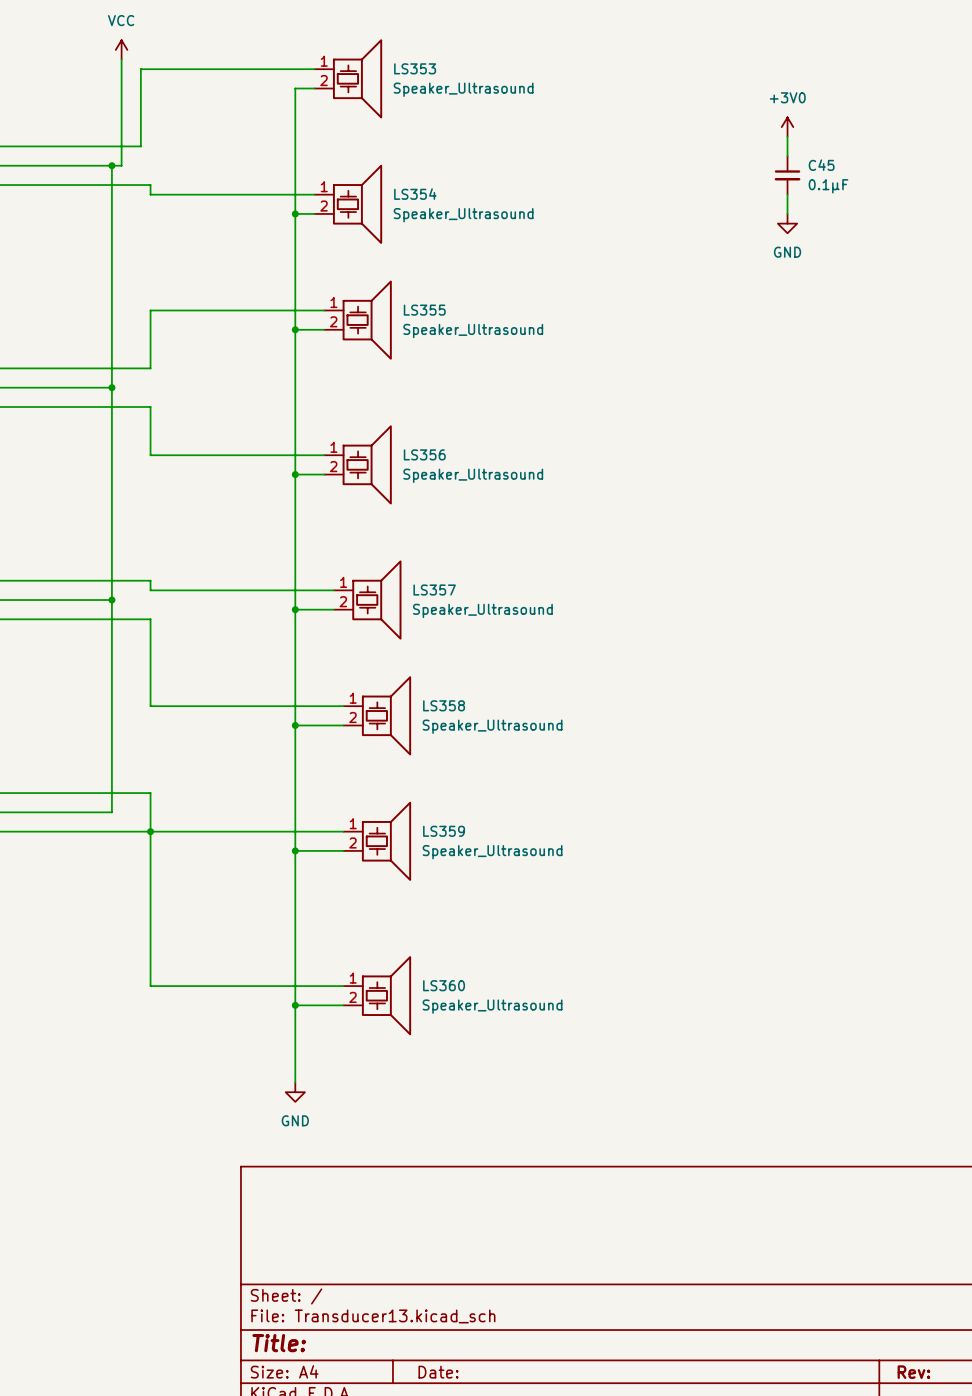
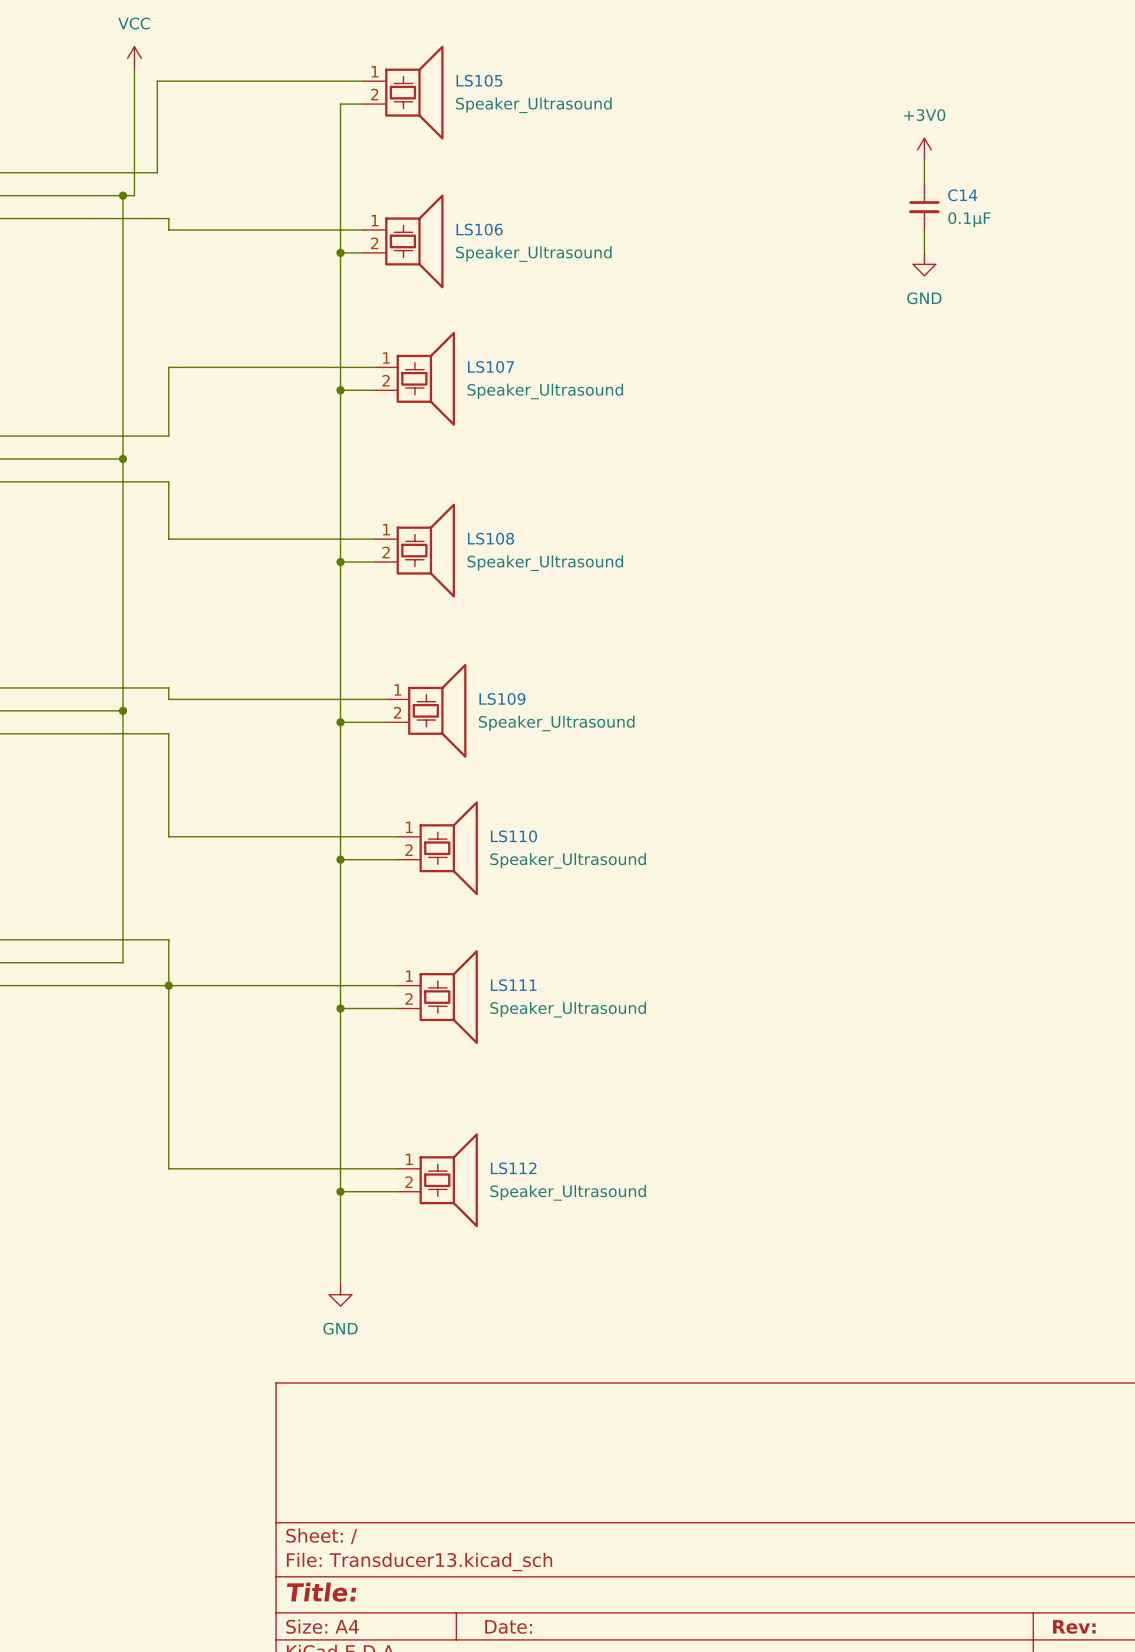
LS353 name: LS353 (415, 68) -> LS105 (479, 80)
C45 name: C45 (821, 165) -> C14 (962, 195)
LS354 name: LS354 (415, 194) -> LS106 (479, 229)
LS355 name: LS355 (424, 310) -> LS107 (490, 366)
LS356 name: LS356 (424, 454) -> LS108 (491, 538)
LS357 name: LS357 (434, 590) -> LS109 (502, 698)
LS358 name: LS358 (444, 705) -> LS110 (513, 836)
LS359 name: LS359 (444, 831) -> LS111 (513, 985)
LS360 name: LS360 (444, 985) -> LS112 (513, 1168)

